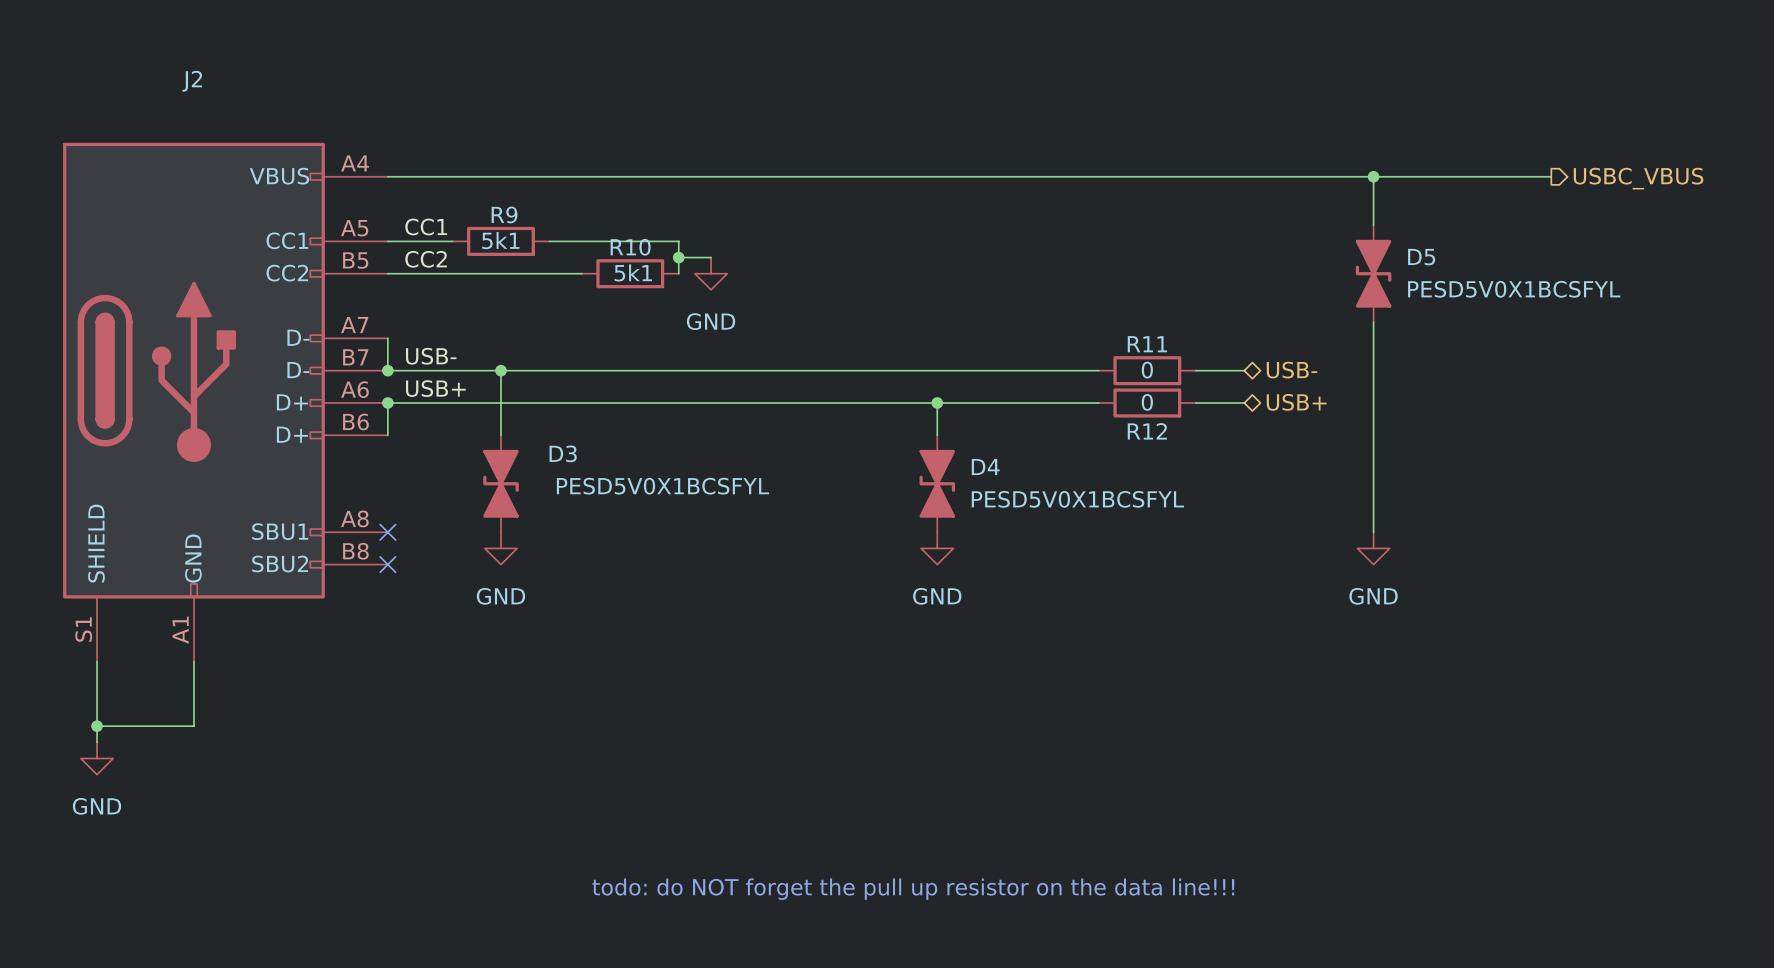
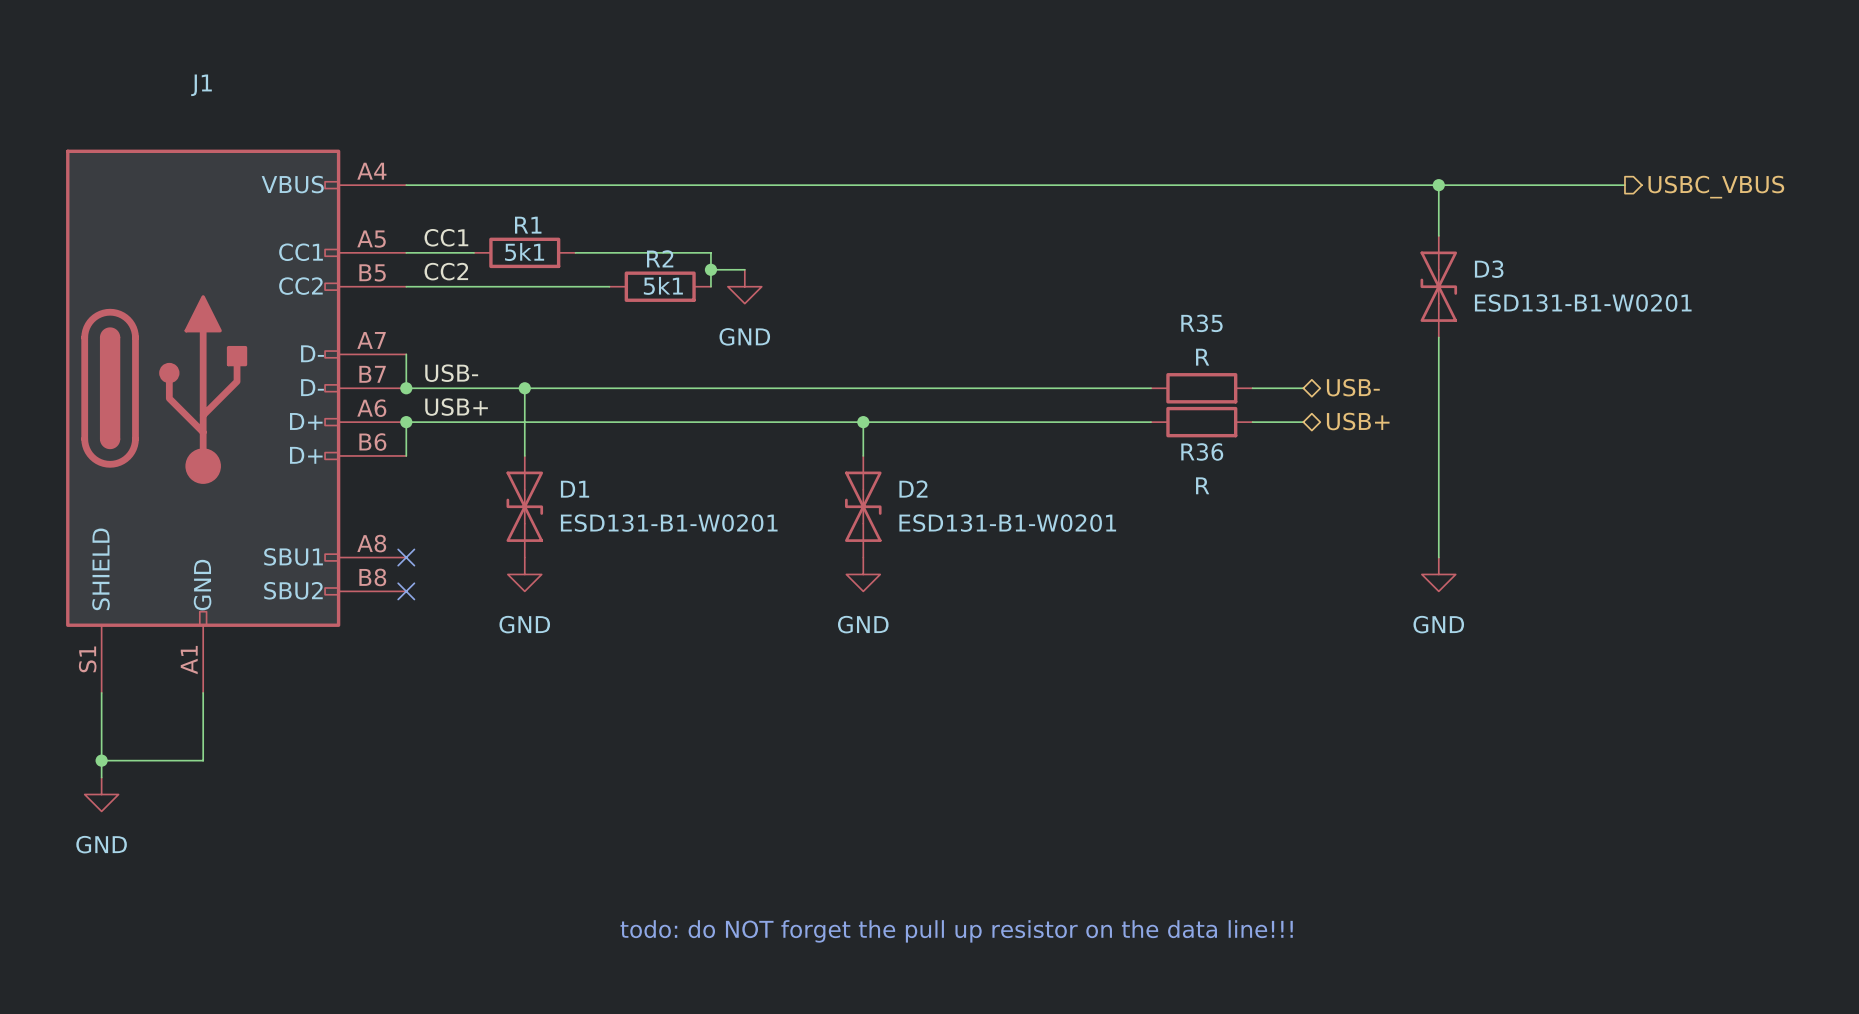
J2 name: J2 (192, 81) -> J1 (201, 85)
R9 name: R9 (504, 214) -> R1 (528, 225)
R10 name: R10 (630, 247) -> R2 (660, 258)
D5: PESD5V0X1BCSFYL (1373, 273) -> none
R11 name: R11 (1147, 344) -> R35 (1201, 323)
R11 value: 0 (1147, 370) -> R (1202, 357)
junction: none -> (863, 422)
wire: (937, 402) (937, 435) -> (863, 422) (863, 455)
junction: (937, 402) -> none
R12 value: 0 (1147, 402) -> R (1202, 485)
R12 name: R12 (1147, 431) -> R36 (1202, 451)
D3 symbol: [483, 435, 519, 533] -> [1420, 235, 1458, 338]
D1: none -> ESD131-B1-W0201 (524, 506)
D2: none -> ESD131-B1-W0201 (863, 506)
D4: PESD5V0X1BCSFYL (937, 483) -> none
D3 value: PESD5V0X1BCSFYL (662, 486) -> ESD131-B1-W0201 (1583, 303)
power symbol position: GND (937, 548) -> GND (863, 574)

